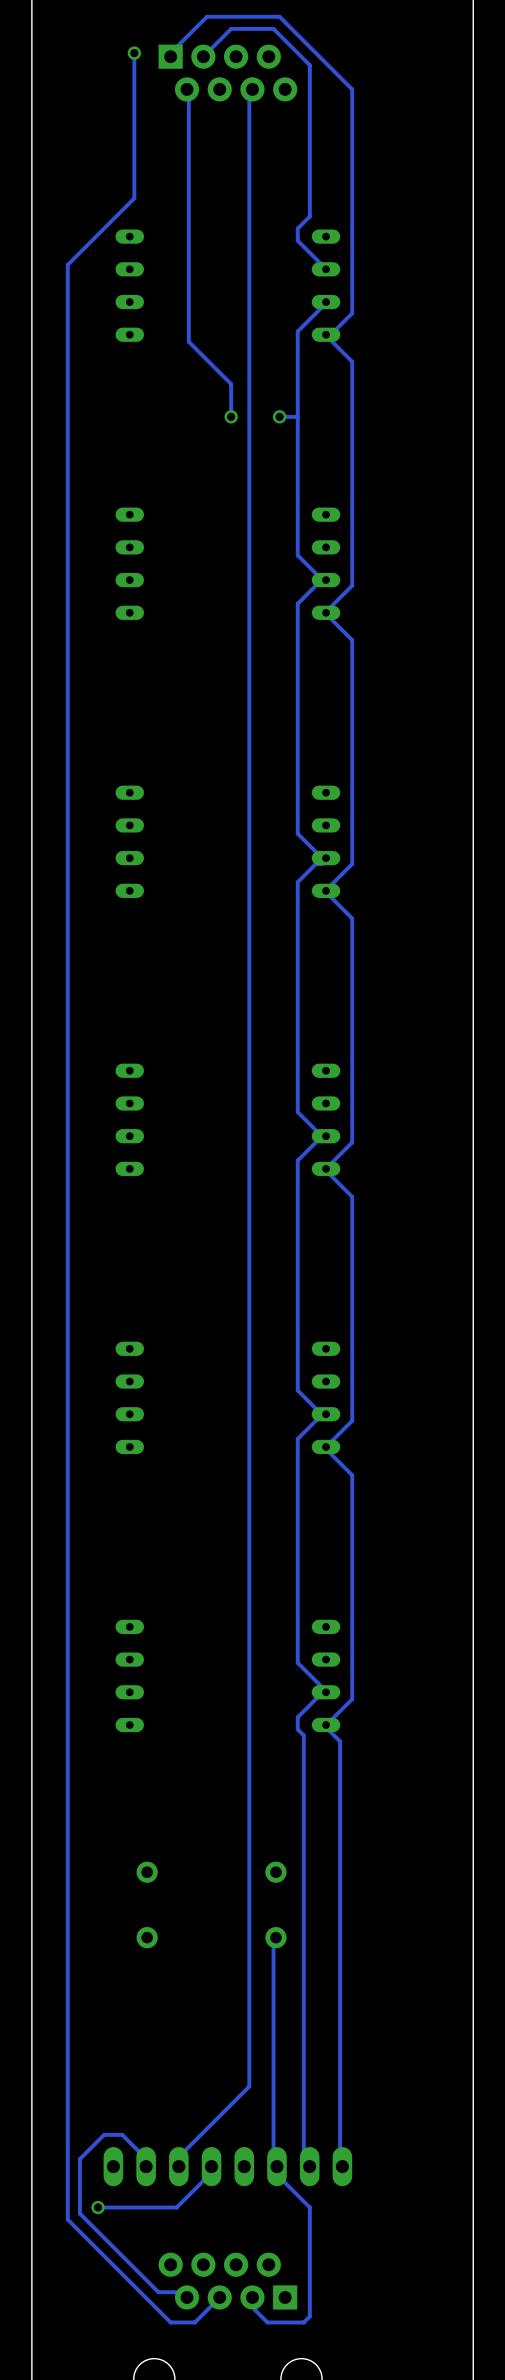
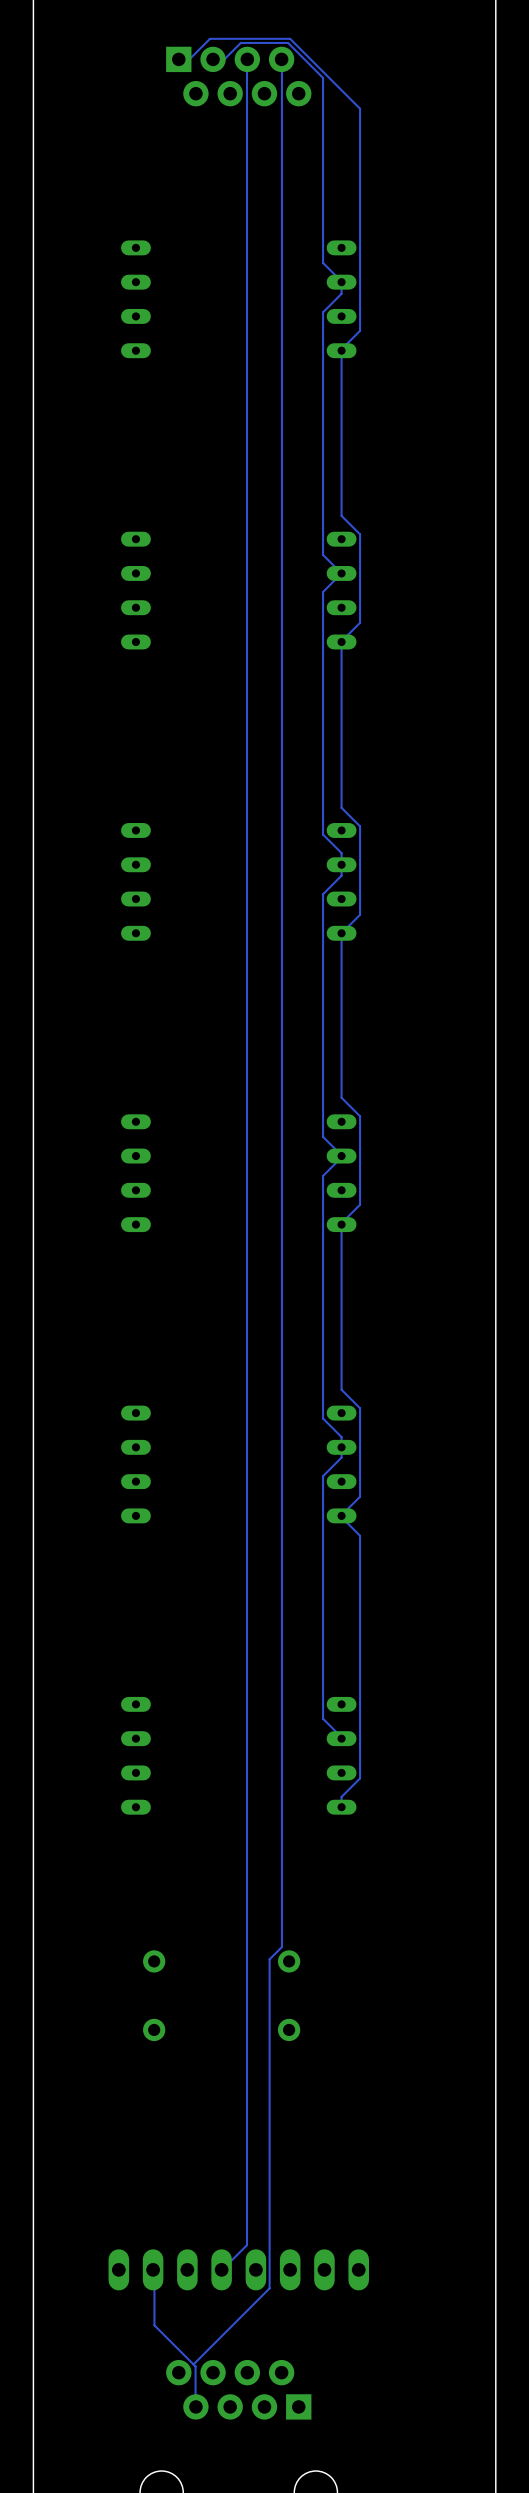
track: (134, 53) (134, 198) (67, 264) (67, 2219) (170, 2322) (194, 2322) (219, 2297) -> none
via: (134, 53) -> none
track: (170, 56) (170, 53) (206, 16) (279, 16) (352, 89) (352, 313) (328, 337) (352, 361) (352, 585) (326, 612) (352, 640) (352, 864) (326, 890) (352, 918) (352, 1142) (326, 1168) (352, 1196) (352, 1420) (326, 1446) (352, 1475) (352, 1699) (326, 1725) (340, 1741) (340, 2165) (342, 2166) -> (178, 59) (189, 59) (209, 38) (290, 38) (360, 108) (360, 330) (341, 349) (341, 515) (360, 534) (360, 622) (341, 641) (341, 807) (360, 826) (360, 914) (341, 933) (341, 1097) (360, 1116) (360, 1204) (341, 1223) (341, 1389) (360, 1408) (360, 1496) (341, 1515) (360, 1535) (360, 1778) (341, 1796) (341, 1807)
track: (203, 56) (231, 28) (273, 28) (309, 65) (309, 216) (297, 228) (297, 240) (326, 269) -> (213, 59) (224, 59) (240, 42) (288, 42) (323, 77) (323, 262) (341, 281) (341, 293) (323, 312) (323, 554) (341, 573) (323, 591) (323, 834) (341, 853) (341, 875) (323, 894) (323, 1136) (341, 1155) (323, 1175) (323, 1418) (341, 1437) (341, 1457) (323, 1476) (323, 1718) (341, 1738)
track: none -> (281, 59) (281, 1947) (269, 1959) (269, 2288) (193, 2364)
track: (187, 89) (188, 89) (188, 341) (231, 384) (231, 416) -> none
track: (252, 89) (249, 89) (249, 2086) (182, 2153) (182, 2165) (178, 2166) -> none
track: (326, 302) (297, 331) (297, 555) (321, 579) -> none
via: (231, 416) -> none
via: (279, 416) -> none
track: (297, 416) (279, 416) -> none
track: (321, 579) (297, 603) (297, 833) (321, 857) (326, 858) (321, 864) (315, 864) (297, 882) (297, 1112) (321, 1136) -> none
track: (321, 1136) (297, 1160) (297, 1390) (321, 1414) -> none
track: (321, 1414) (297, 1438) (297, 1662) (326, 1692) (321, 1693) (297, 1717) (297, 1729) (303, 1735) (303, 2165) (309, 2166) -> none
track: (275, 1937) (273, 1941) (273, 2165) (276, 2166) (273, 2171) (309, 2207) (309, 2316) (303, 2322) (267, 2322) (255, 2310) (255, 2298) (252, 2297) -> none
track: (146, 2166) (140, 2165) (140, 2153) (122, 2134) (104, 2134) (79, 2159) (79, 2213) (158, 2292) (182, 2292) (187, 2297) -> (153, 2269) (154, 2325) (195, 2366) (195, 2406)
track: (211, 2166) (206, 2171) (206, 2177) (176, 2207) (98, 2207) -> (221, 2269) (246, 2245) (247, 59)
via: (98, 2207) -> none

